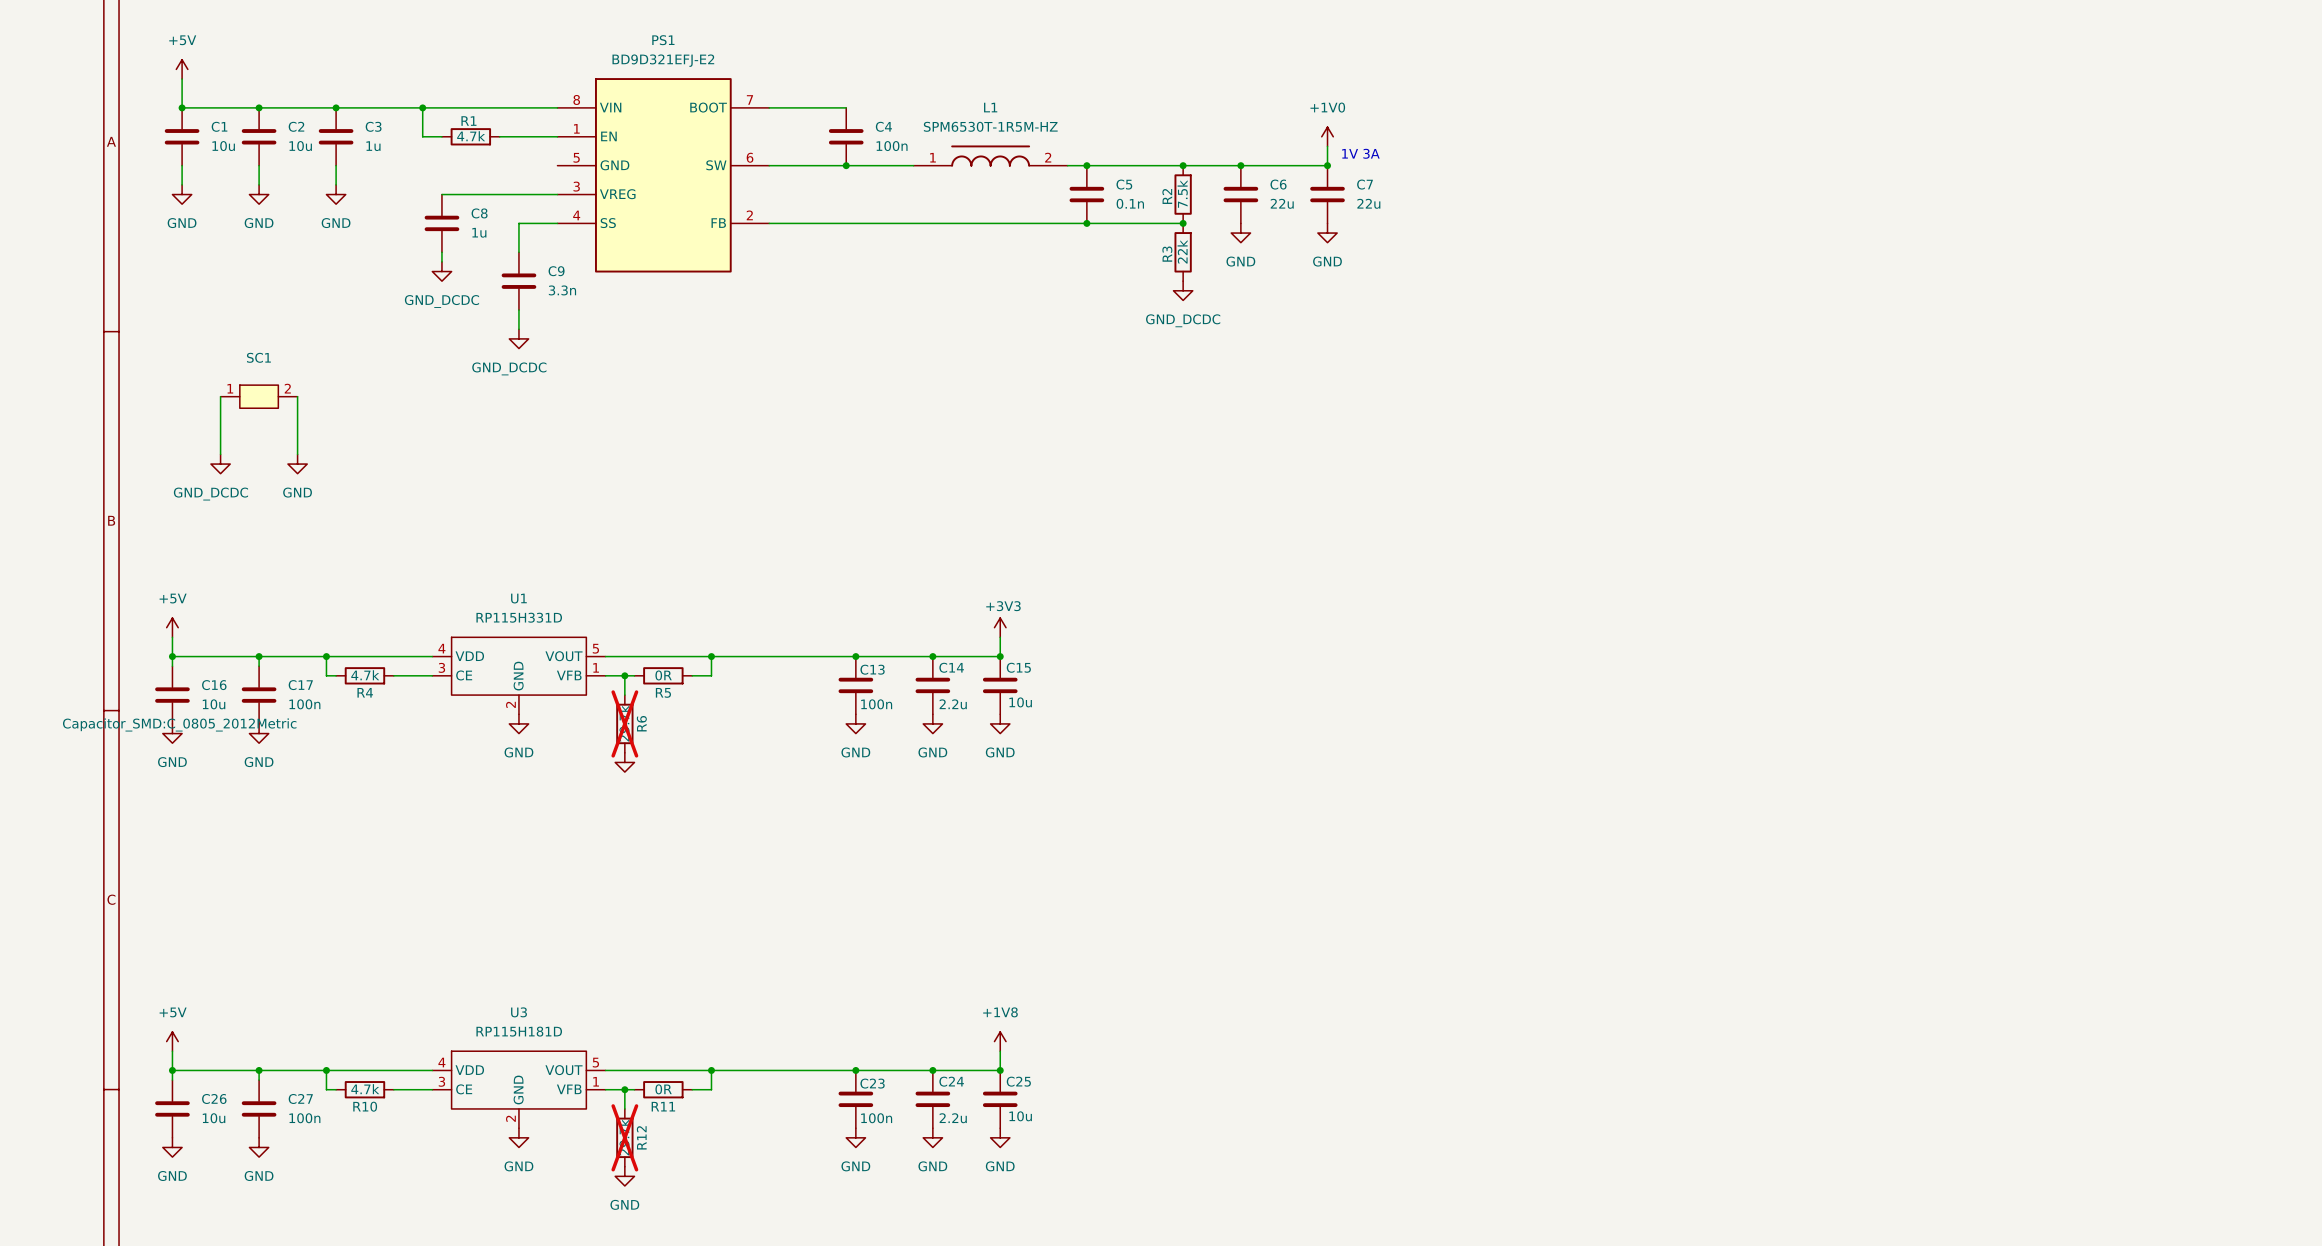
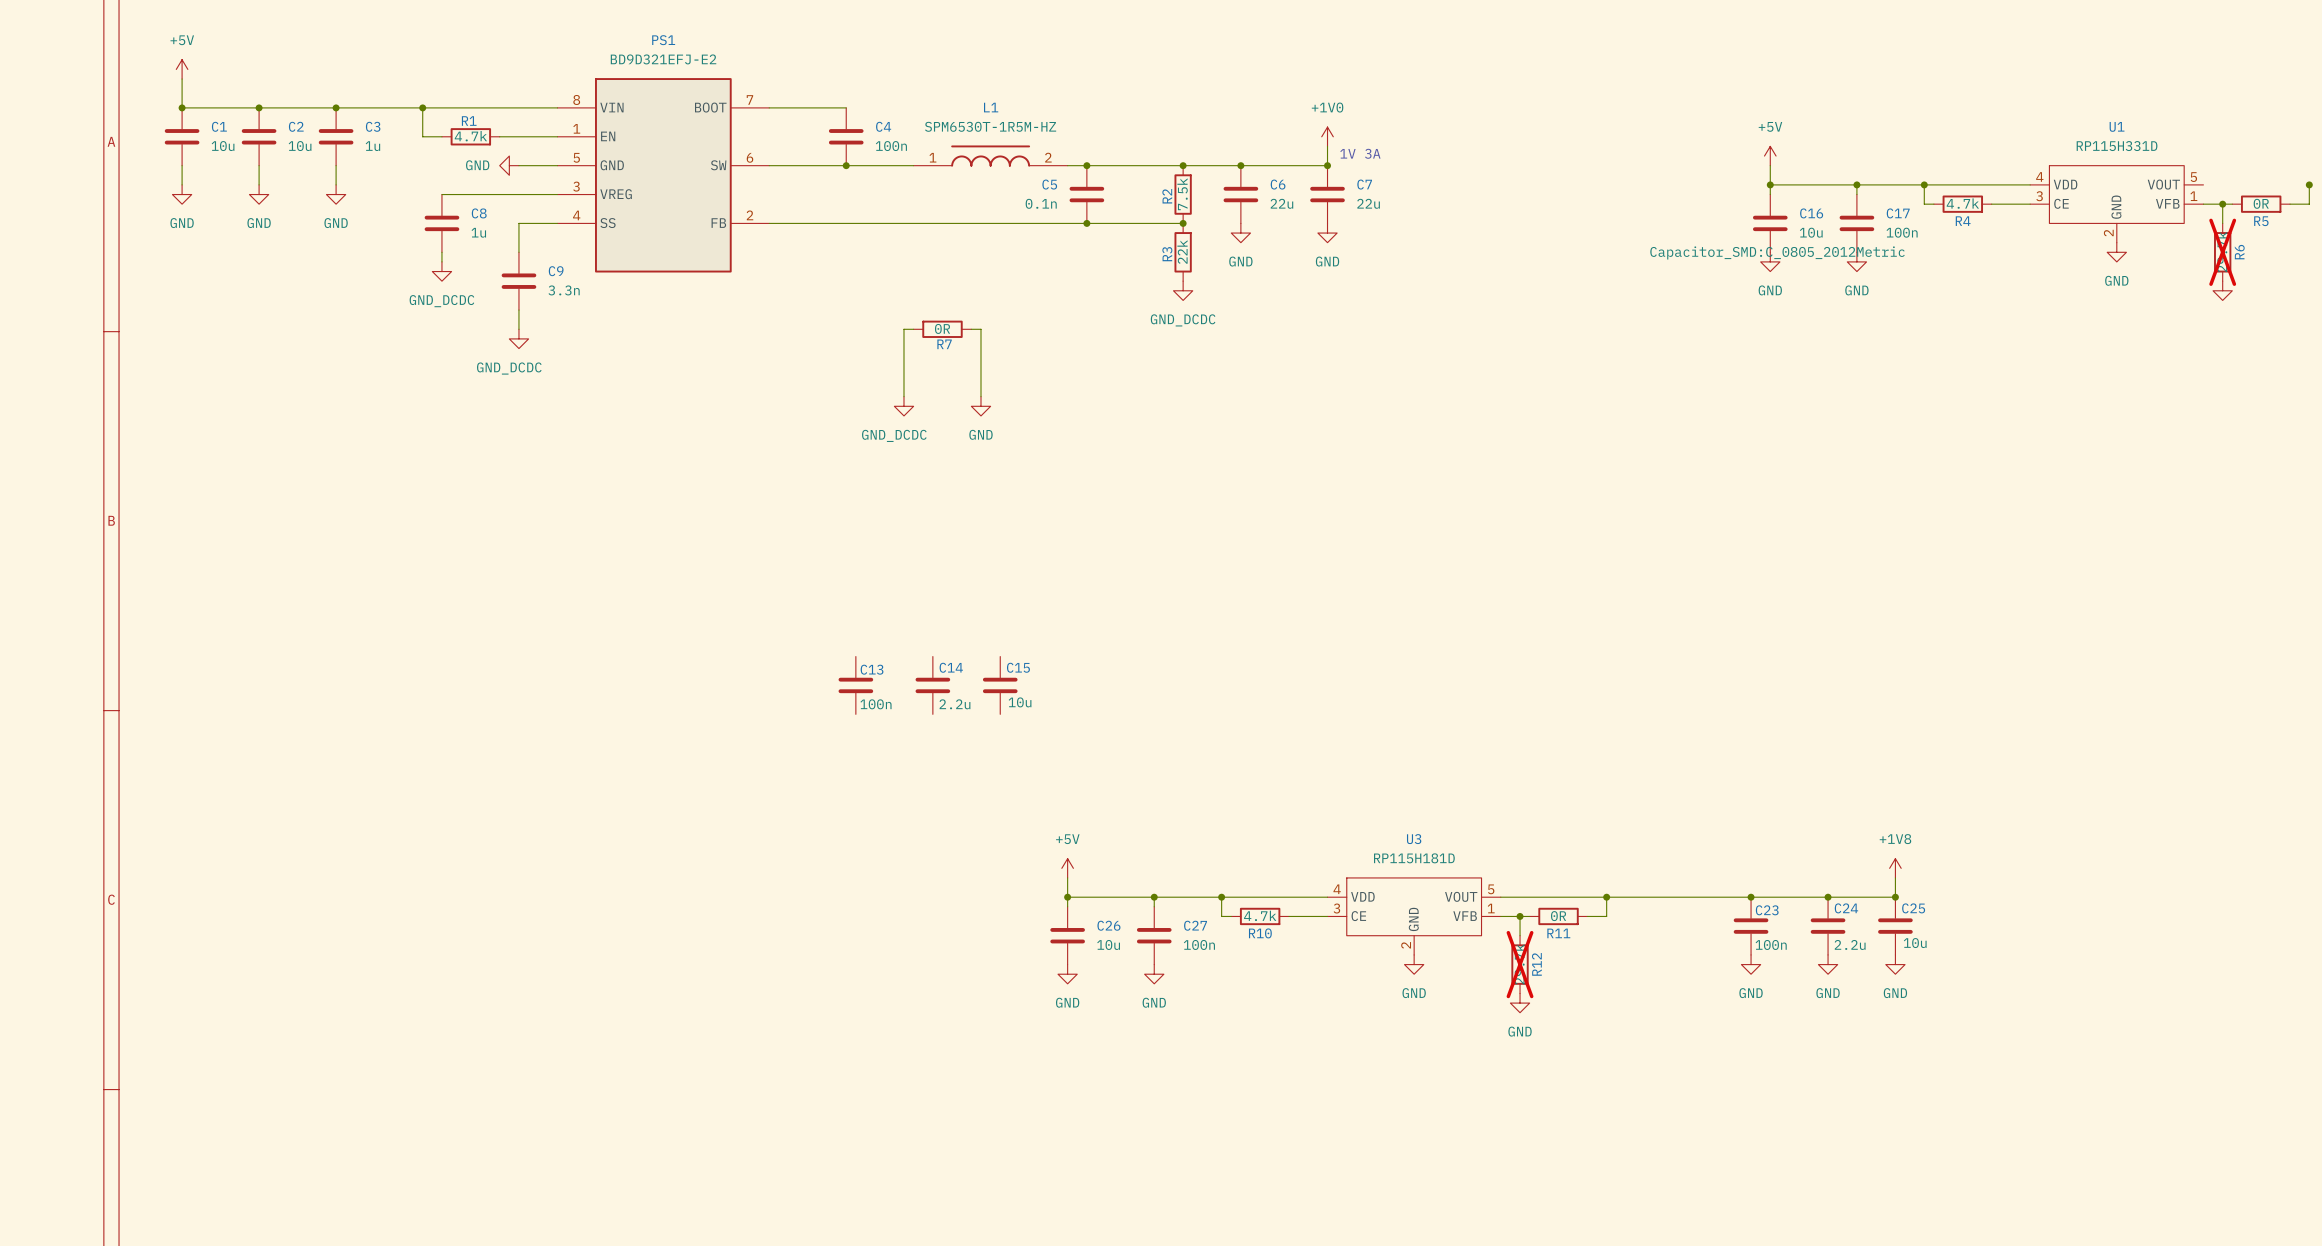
power symbol: none -> +5V (1770, 156)
power symbol: none -> GND (509, 165)
wire: none -> (518, 165) (557, 165)
wire: none -> (1770, 165) (1770, 194)
C5 name position: C5 (1124, 184) -> C5 (1049, 184)
wire: none -> (1770, 184) (2030, 184)
junction: none -> (1770, 184)
wire: none -> (1856, 184) (1856, 194)
junction: none -> (1856, 184)
wire: none -> (1924, 184) (1924, 204) (1933, 204)
junction: none -> (1924, 184)
wire: none -> (2309, 184) (2309, 204) (2290, 204)
junction: none -> (2309, 184)
C5 value position: 0.1n (1130, 203) -> 0.1n (1041, 203)
wire: none -> (1991, 204) (2030, 204)
wire: none -> (2203, 204) (2232, 204)
wire: none -> (2222, 204) (2222, 223)
junction: none -> (2222, 204)
power symbol: none -> GND (2116, 252)
power symbol: none -> GND (1770, 261)
power symbol: none -> GND (1856, 261)
power symbol: none -> (2222, 290)
wire: none -> (913, 329) (903, 329) (903, 396)
R7: none -> 0R (942, 329)
wire: none -> (971, 329) (980, 329) (980, 396)
wire: (220, 396) (220, 454) -> none
SC1: (259, 396) -> none
wire: (297, 396) (297, 454) -> none
power symbol: none -> GND_DCDC (903, 406)
power symbol: none -> GND (980, 406)
power symbol: GND_DCDC (220, 464) -> none
power symbol: GND (297, 464) -> none
power symbol: +5V (172, 627) -> none
power symbol: +3V3 (1000, 627) -> none
wire: (172, 637) (172, 666) -> none
wire: (1000, 637) (1000, 656) (605, 656) -> none
wire: (172, 656) (432, 656) -> none
junction: (172, 656) -> none
wire: (259, 656) (259, 666) -> none
junction: (259, 656) -> none
wire: (326, 656) (326, 675) (336, 675) -> none
junction: (326, 656) -> none
wire: (711, 656) (711, 675) (692, 675) -> none
junction: (711, 656) -> none
junction: (855, 656) -> none
junction: (932, 656) -> none
junction: (1000, 656) -> none
R4 position: (364, 675) -> (1962, 204)
wire: (393, 675) (432, 675) -> none
U1 position: (518, 675) -> (2116, 204)
wire: (605, 675) (634, 675) -> none
wire: (624, 675) (624, 695) -> none
junction: (624, 675) -> none
R5 position: (663, 675) -> (2261, 204)
C16 position: (172, 695) -> (1770, 223)
C17 position: (259, 695) -> (1856, 223)
power symbol: GND (518, 723) -> none
R6 position: (624, 723) -> (2222, 252)
power symbol: GND (855, 723) -> none
power symbol: GND (932, 723) -> none
power symbol: GND (1000, 723) -> none
power symbol: GND (172, 733) -> none
power symbol: GND (259, 733) -> none
power symbol: (624, 762) -> none
power symbol: none -> +5V (1067, 868)
power symbol: none -> +1V8 (1895, 868)
wire: none -> (1067, 877) (1067, 906)
wire: none -> (1895, 877) (1895, 897) (1500, 897)
wire: none -> (1067, 897) (1327, 897)
junction: none -> (1067, 897)
wire: none -> (1154, 897) (1154, 906)
junction: none -> (1154, 897)
wire: none -> (1221, 897) (1221, 916) (1231, 916)
junction: none -> (1221, 897)
wire: none -> (1606, 897) (1606, 916) (1587, 916)
junction: none -> (1606, 897)
junction: none -> (1751, 897)
junction: none -> (1828, 897)
junction: none -> (1895, 897)
wire: none -> (1289, 916) (1327, 916)
wire: none -> (1500, 916) (1529, 916)
wire: none -> (1520, 916) (1520, 935)
junction: none -> (1520, 916)
power symbol: none -> GND (1414, 964)
power symbol: none -> GND (1751, 964)
power symbol: none -> GND (1828, 964)
power symbol: none -> GND (1895, 964)
power symbol: none -> GND (1067, 974)
power symbol: none -> GND (1154, 974)
power symbol: none -> GND (1520, 1003)
power symbol: +5V (172, 1041) -> none
power symbol: +1V8 (1000, 1041) -> none
wire: (172, 1051) (172, 1080) -> none
wire: (1000, 1051) (1000, 1070) (605, 1070) -> none
wire: (172, 1070) (432, 1070) -> none
junction: (172, 1070) -> none
wire: (259, 1070) (259, 1080) -> none
junction: (259, 1070) -> none
wire: (326, 1070) (326, 1089) (336, 1089) -> none
junction: (326, 1070) -> none
wire: (711, 1070) (711, 1089) (692, 1089) -> none
junction: (711, 1070) -> none
junction: (855, 1070) -> none
junction: (932, 1070) -> none
junction: (1000, 1070) -> none
R10 position: (364, 1089) -> (1260, 916)
wire: (393, 1089) (432, 1089) -> none
U3 position: (518, 1089) -> (1414, 916)
wire: (605, 1089) (634, 1089) -> none
wire: (624, 1089) (624, 1108) -> none
junction: (624, 1089) -> none
R11 position: (663, 1089) -> (1558, 916)
C23 position: (855, 1099) -> (1751, 926)
C24 position: (932, 1099) -> (1828, 926)
C25 position: (1000, 1099) -> (1895, 926)
C26 position: (172, 1108) -> (1067, 935)
C27 position: (259, 1108) -> (1154, 935)
power symbol: GND (518, 1137) -> none
R12 position: (624, 1137) -> (1520, 964)
power symbol: GND (855, 1137) -> none
power symbol: GND (932, 1137) -> none
power symbol: GND (1000, 1137) -> none
power symbol: GND (172, 1147) -> none
power symbol: GND (259, 1147) -> none
power symbol: GND (624, 1176) -> none

